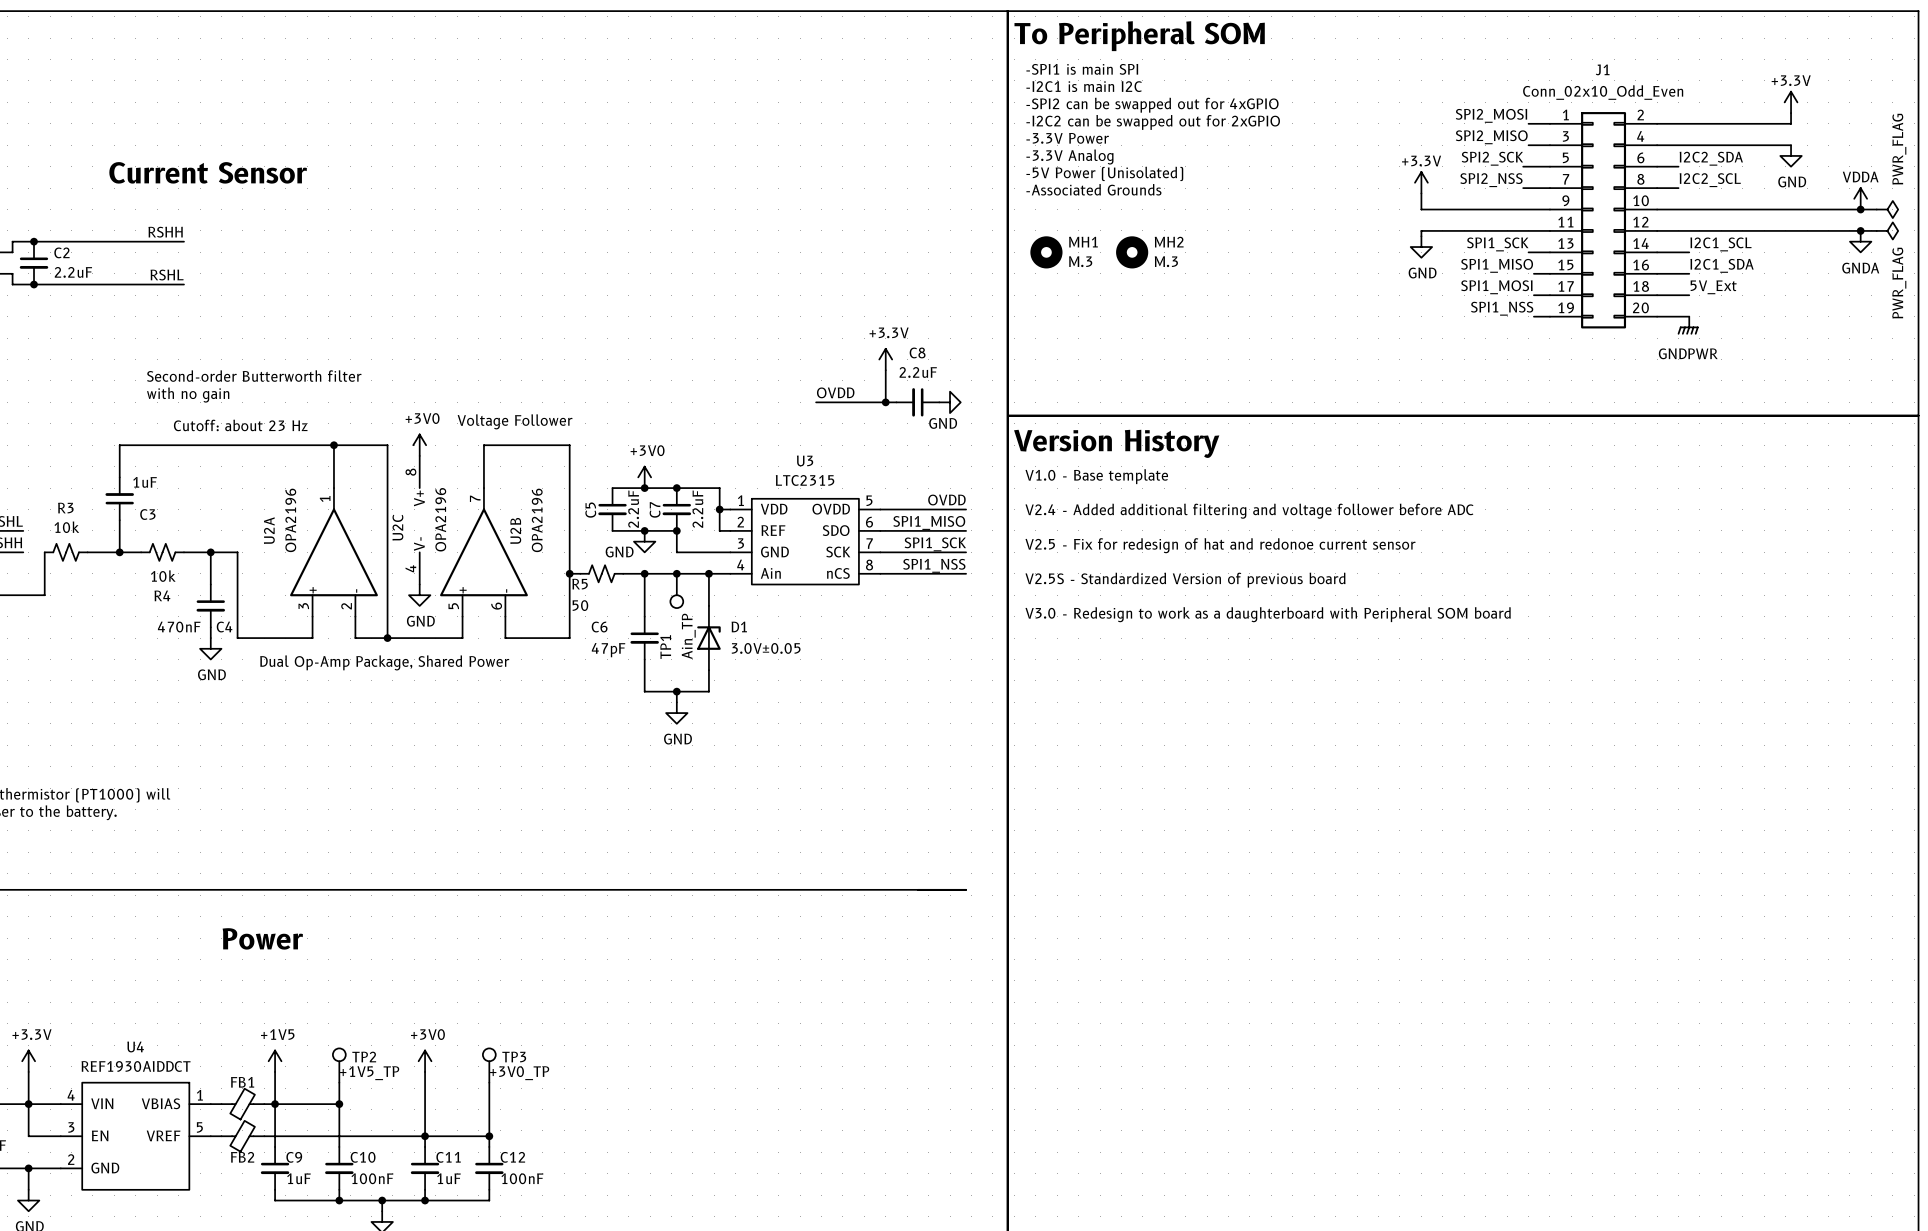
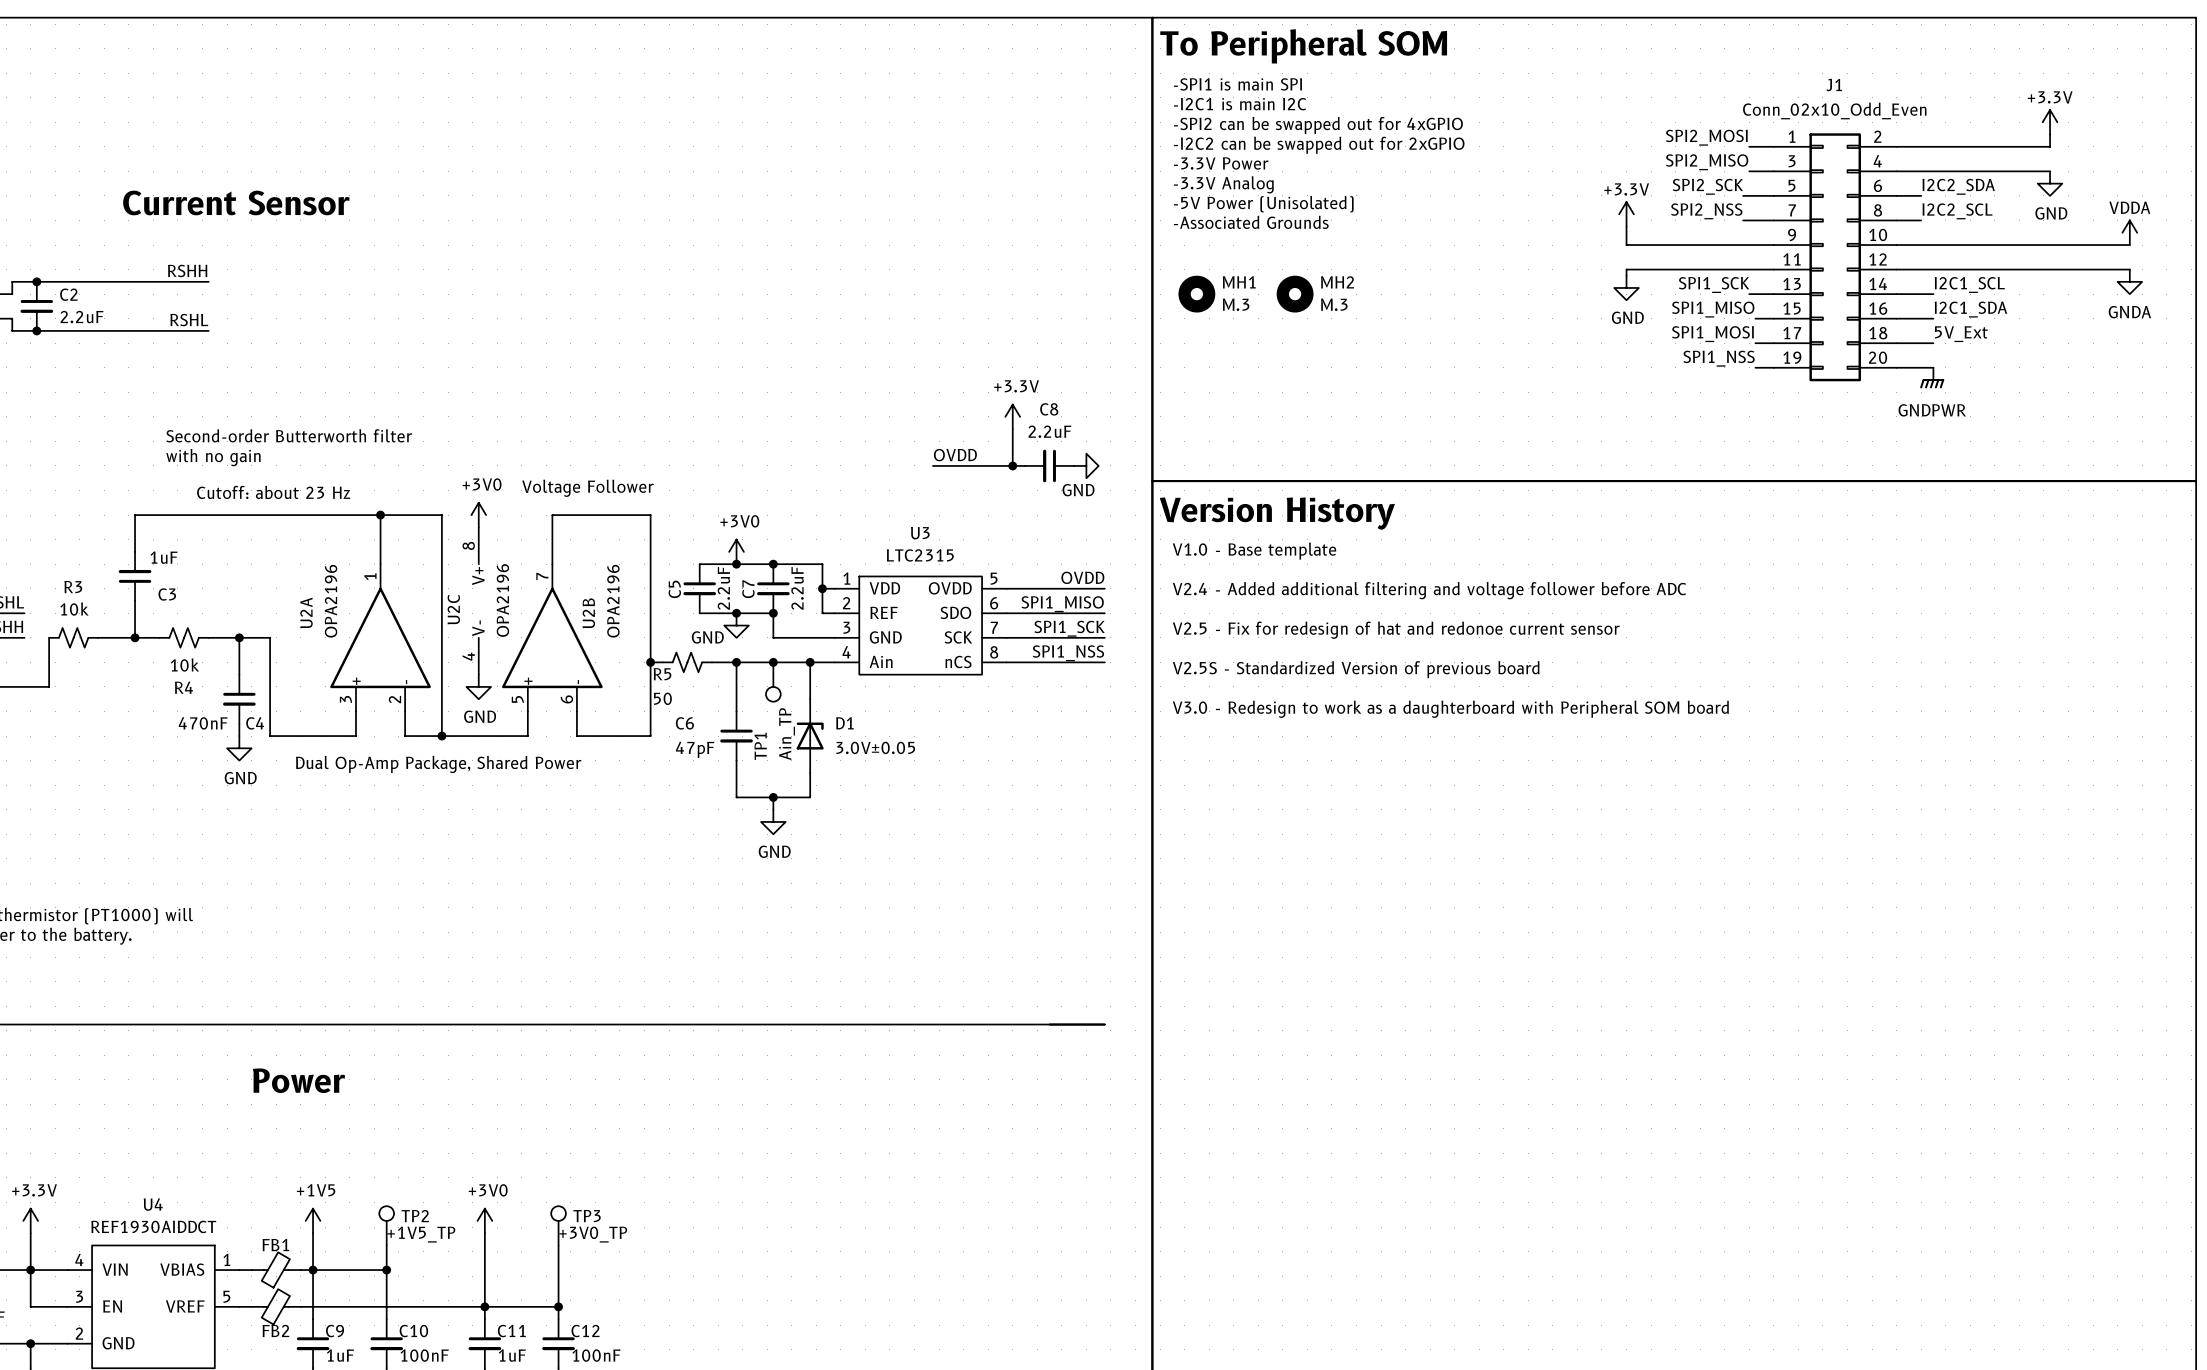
wire: (1860, 209) (1876, 209) -> none
junction: (1860, 209) -> none
power symbol: PWR_FLAG (1887, 209) -> none
wire: (1860, 230) (1876, 230) -> none
junction: (1860, 230) -> none
power symbol: PWR_FLAG (1887, 230) -> none

